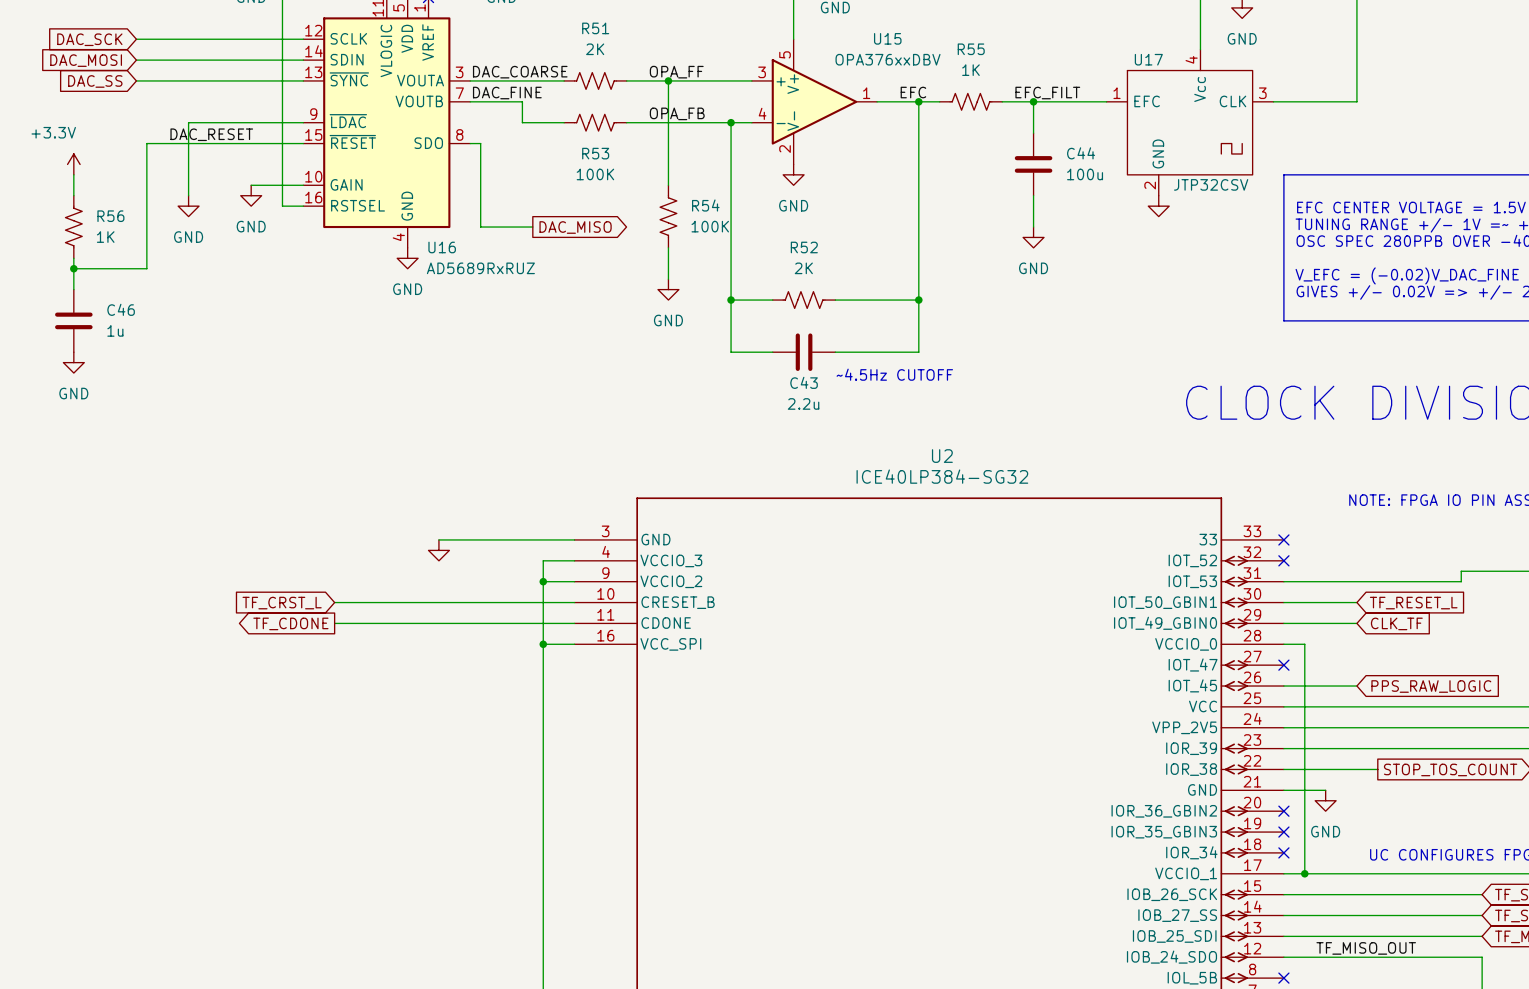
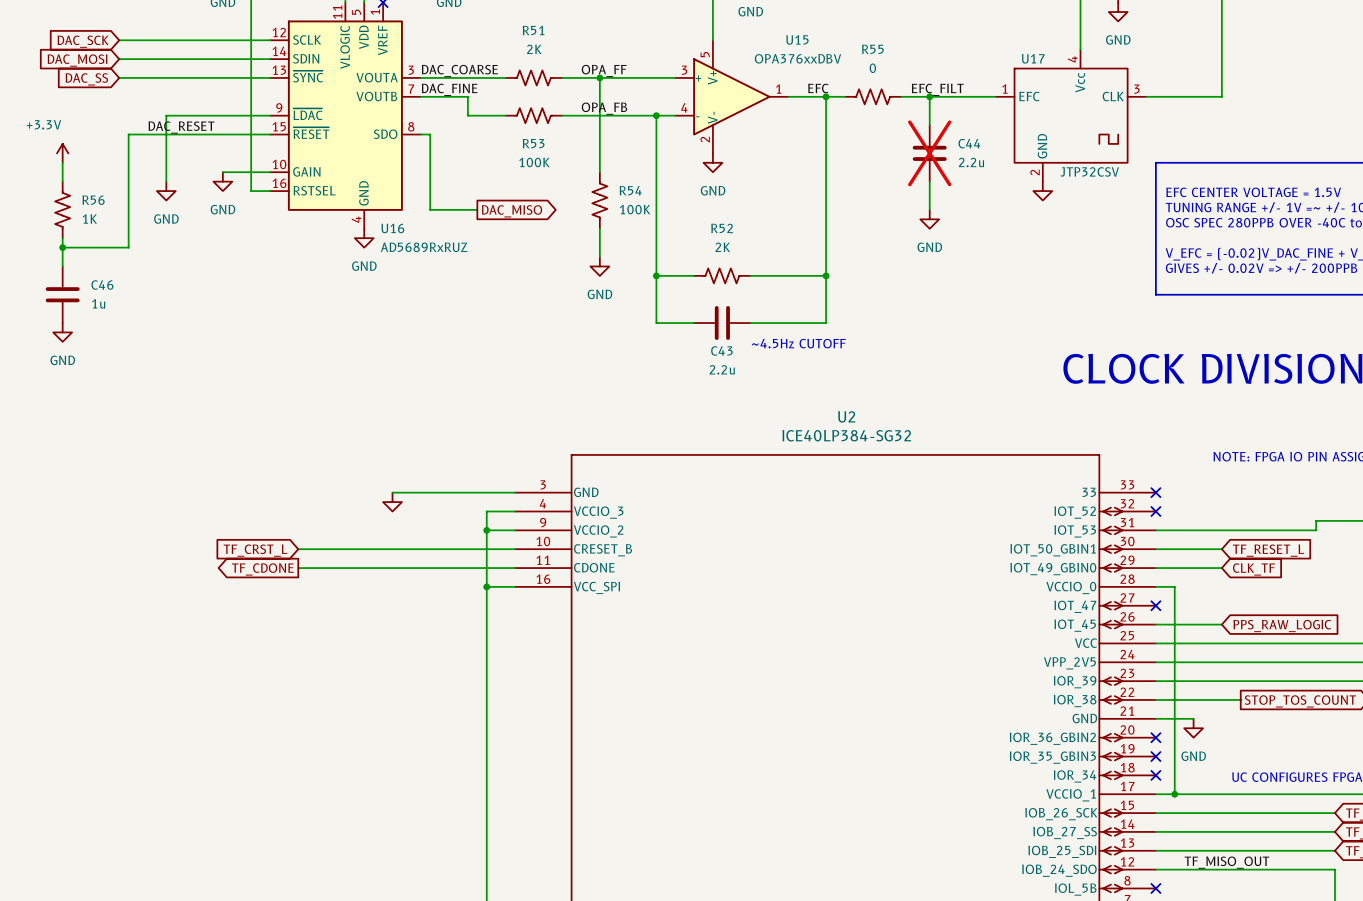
R55 value: 1K (970, 70) -> 0 (872, 68)
C44 do-not-place cross: none -> (929, 153)
C44 value: 100u (1085, 174) -> 2.2u (971, 162)

